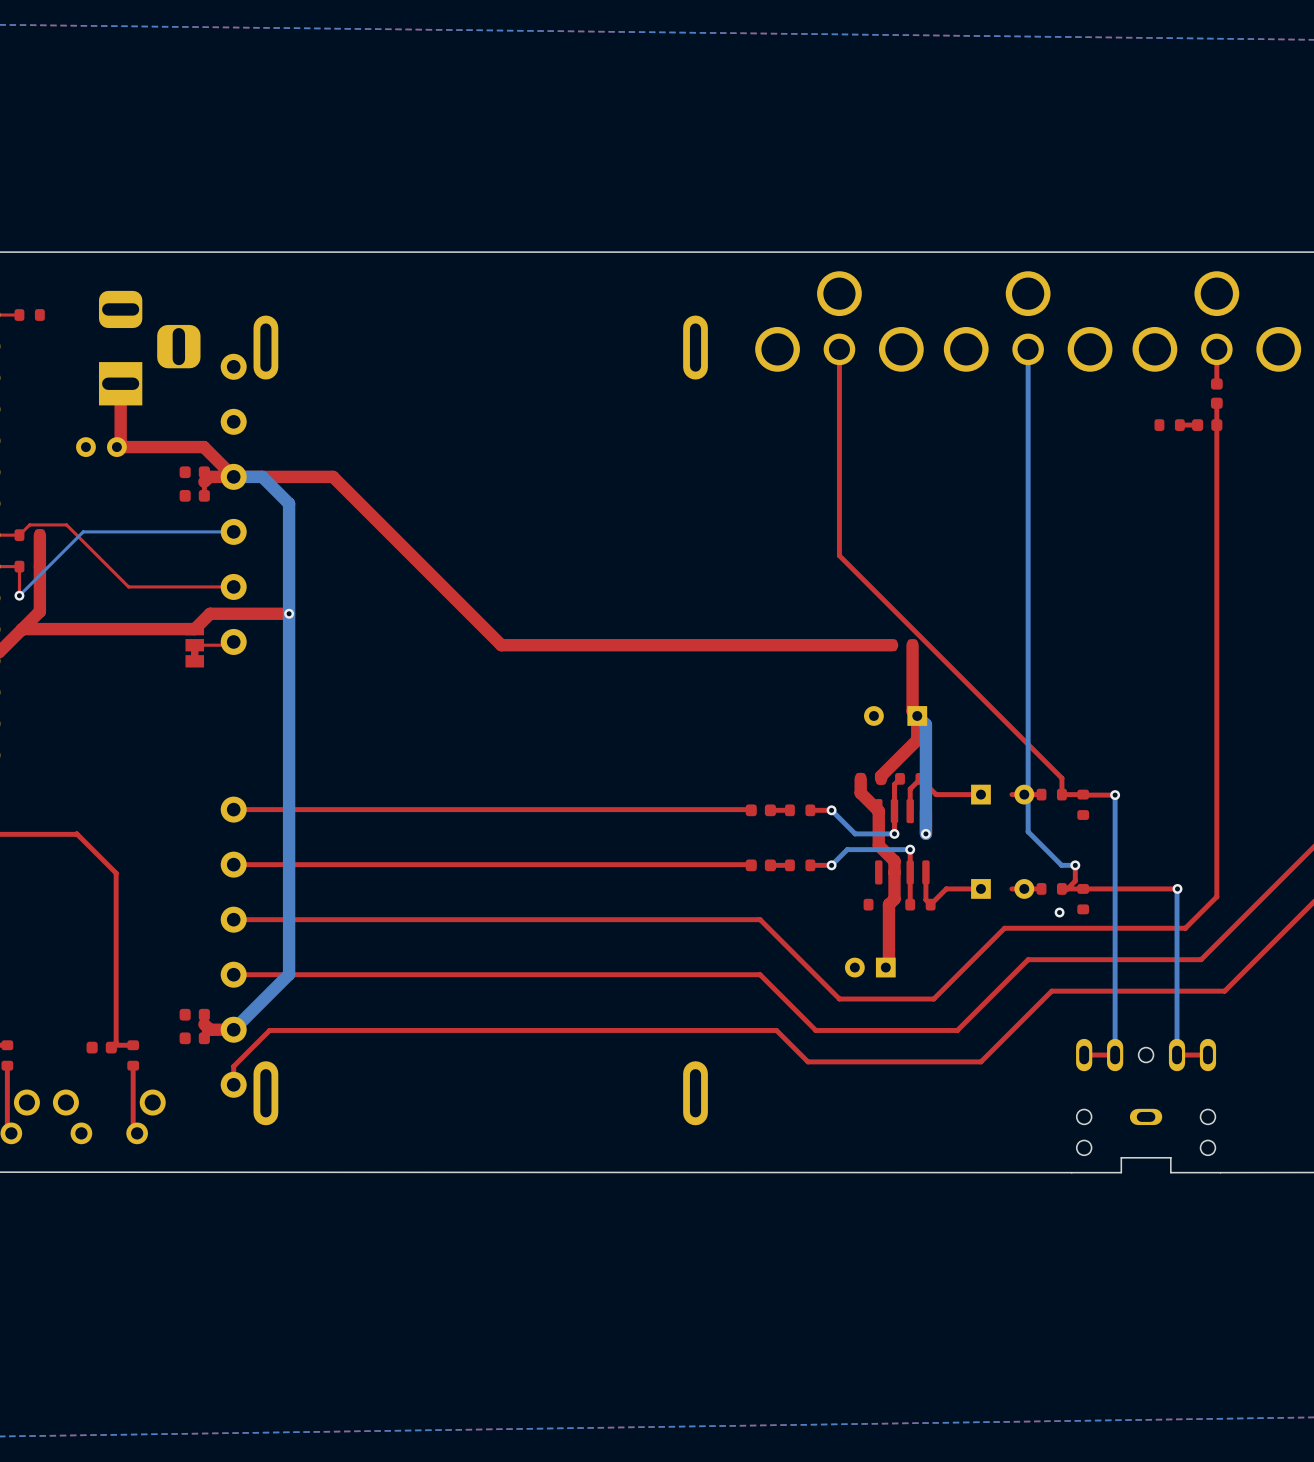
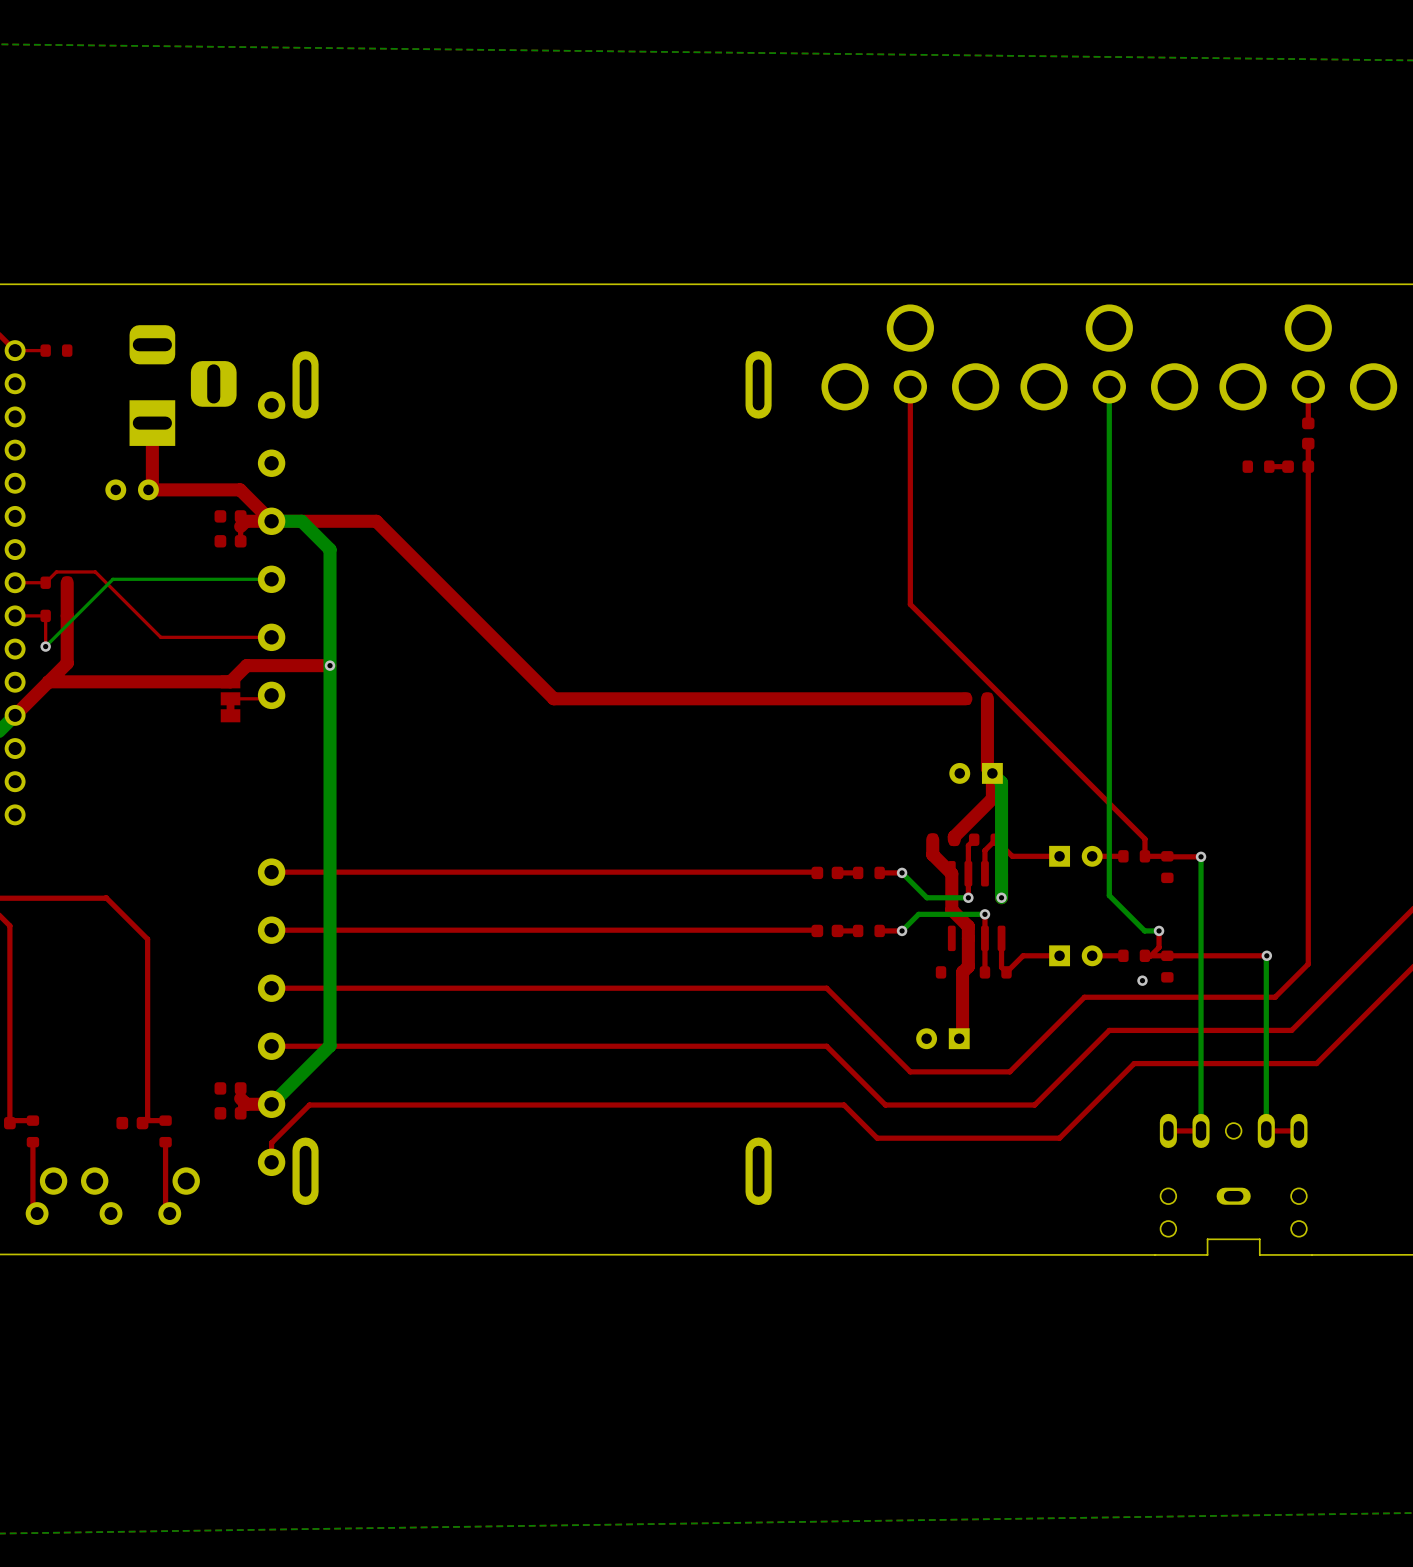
part footprint: [864, 706, 928, 726] -> [949, 762, 1003, 784]
part footprint: [971, 784, 1035, 805] -> [1049, 845, 1103, 867]
part footprint: [971, 879, 1035, 899] -> [1049, 945, 1103, 967]

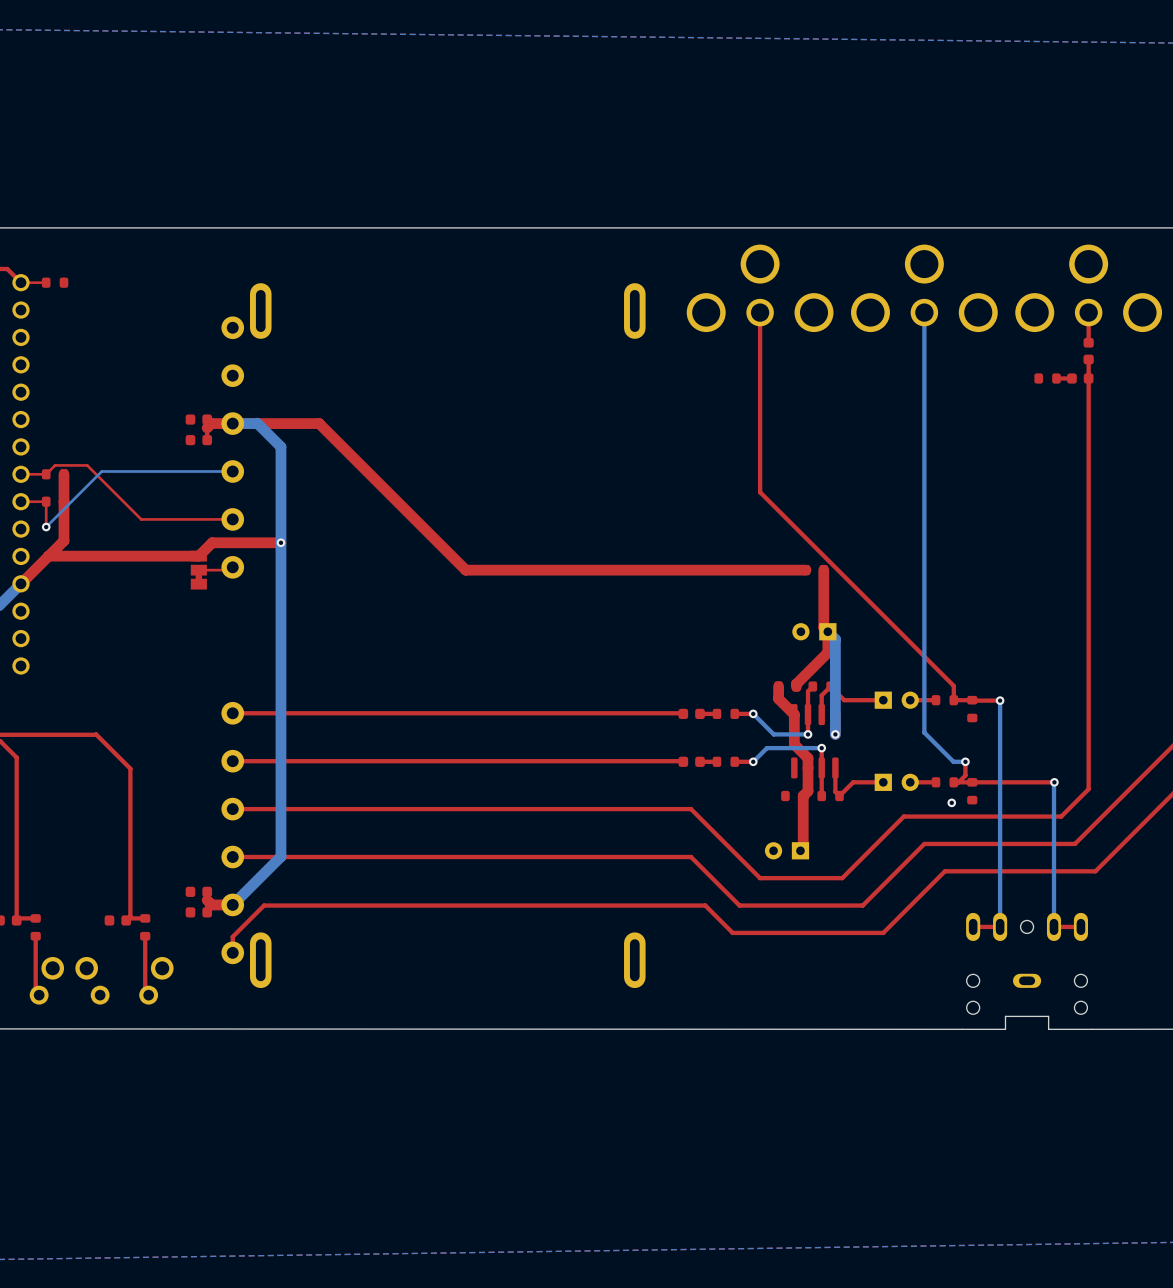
part: (183, 385) -> none
top track: (152, 423) (152, 485) (148, 489) (240, 489) (271, 521) -> none
part: (132, 489) -> none

